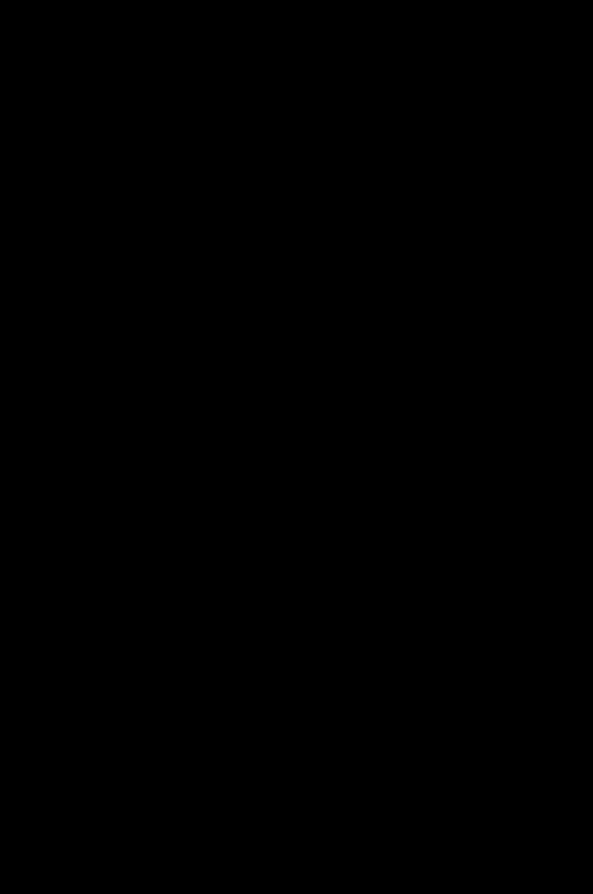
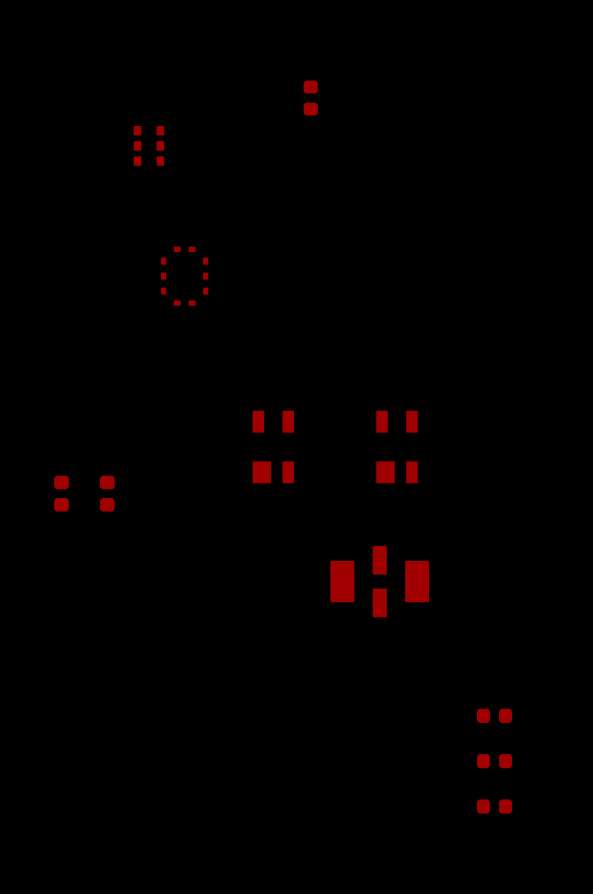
part: none -> (310, 98)
part: none -> (148, 145)
part: none -> (184, 276)
part: none -> (273, 447)
part: none -> (397, 447)
part: none -> (61, 493)
part: none -> (107, 493)
part: none -> (379, 581)
part: none -> (494, 715)
part: none -> (494, 761)
part: none -> (494, 806)

